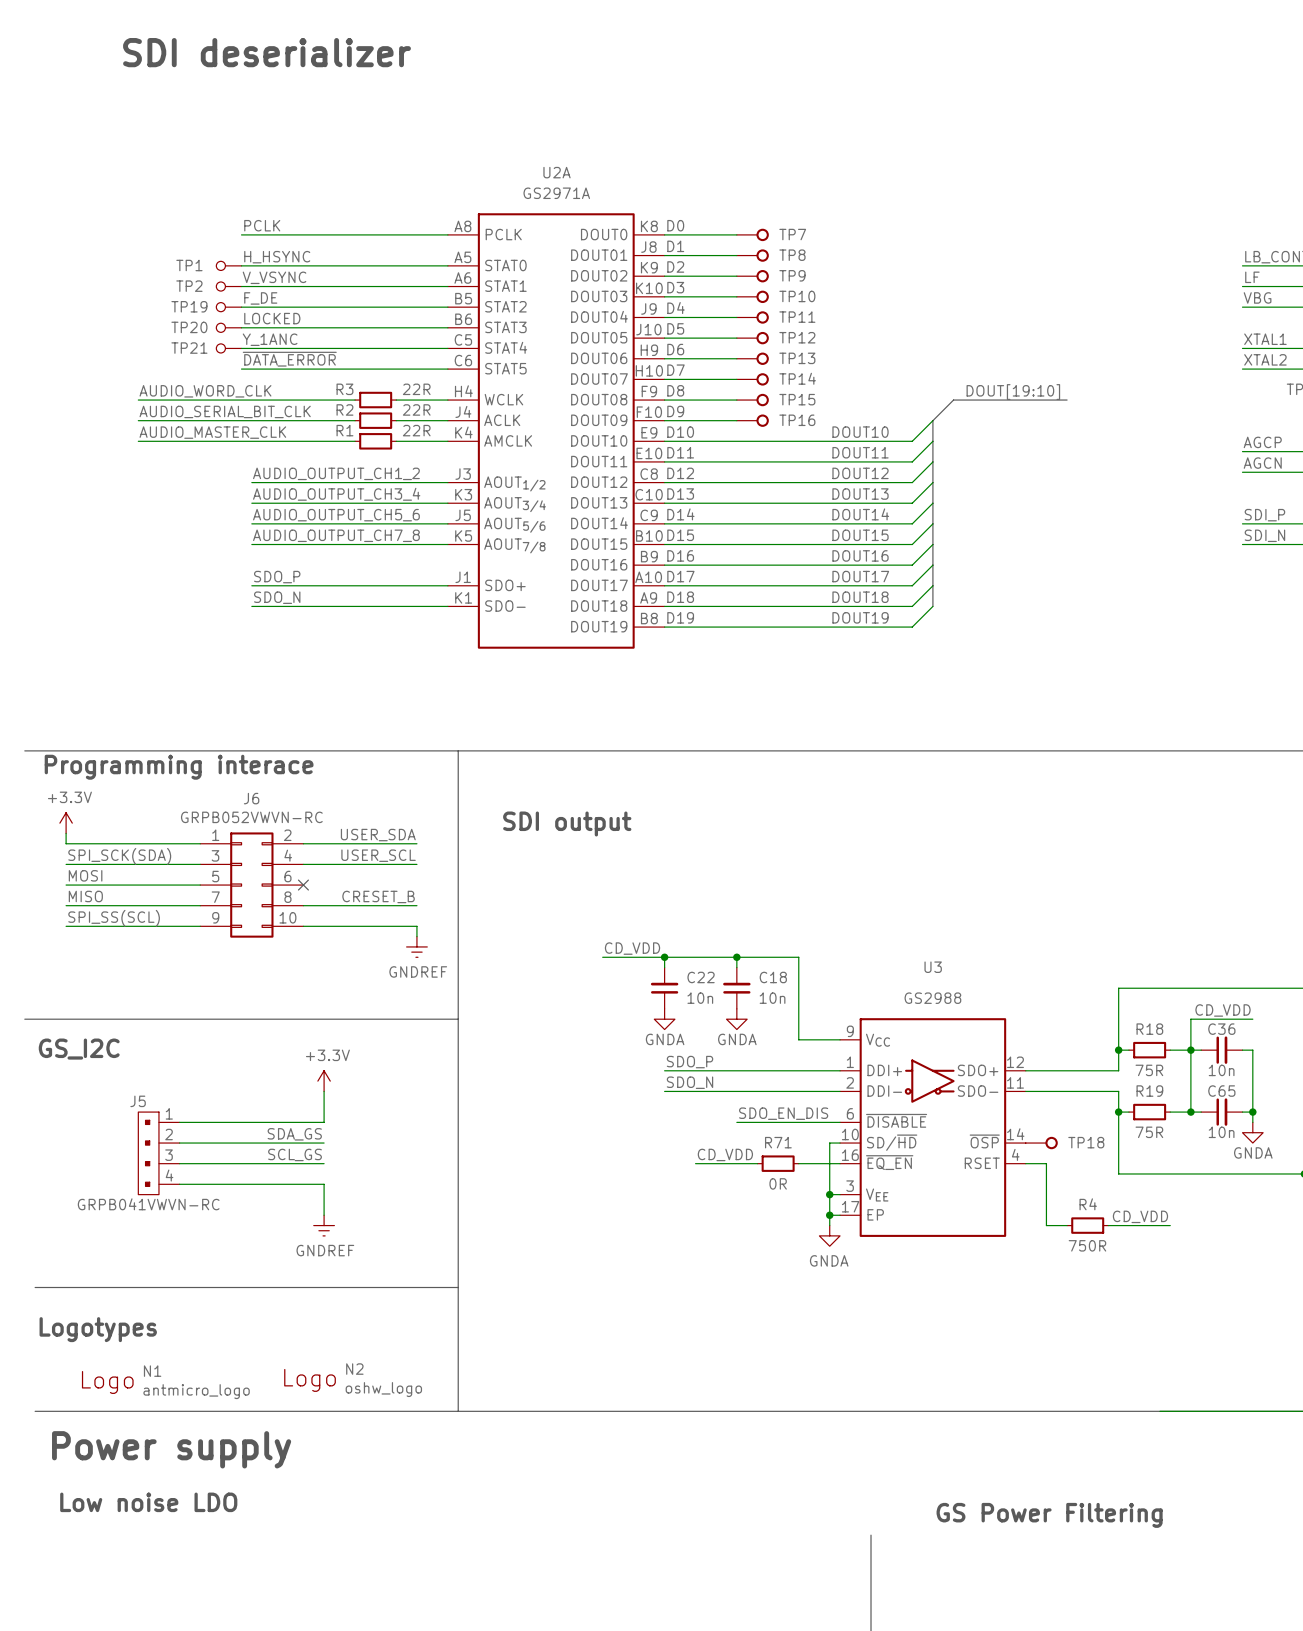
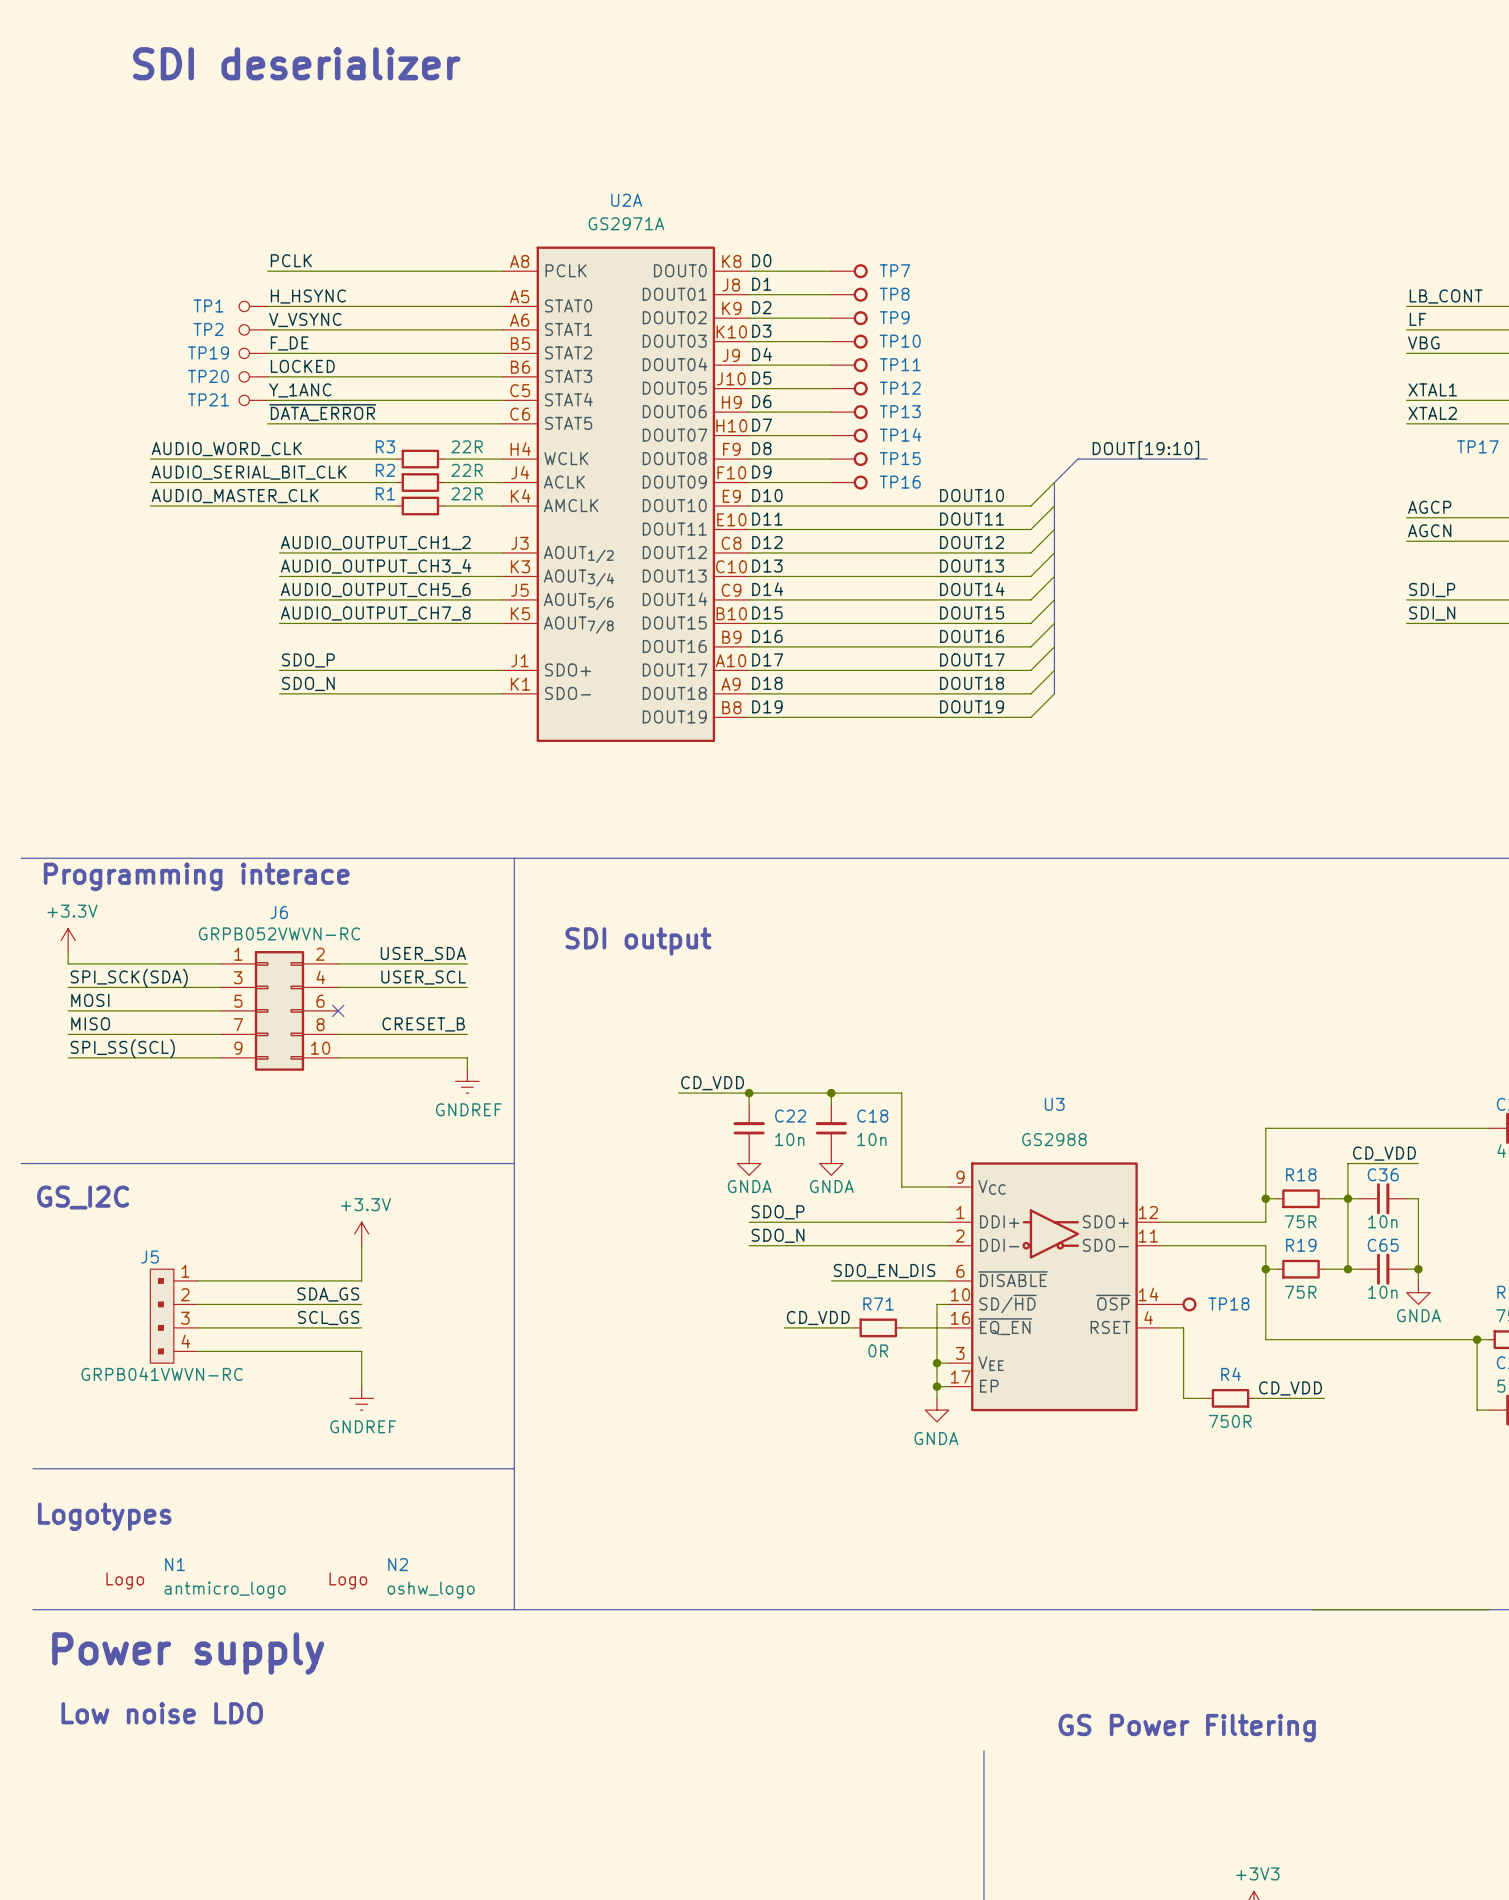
N2 symbol: [284, 1363, 423, 1398] -> [329, 1558, 475, 1599]
N1 symbol: [81, 1365, 250, 1400] -> [106, 1558, 286, 1599]

